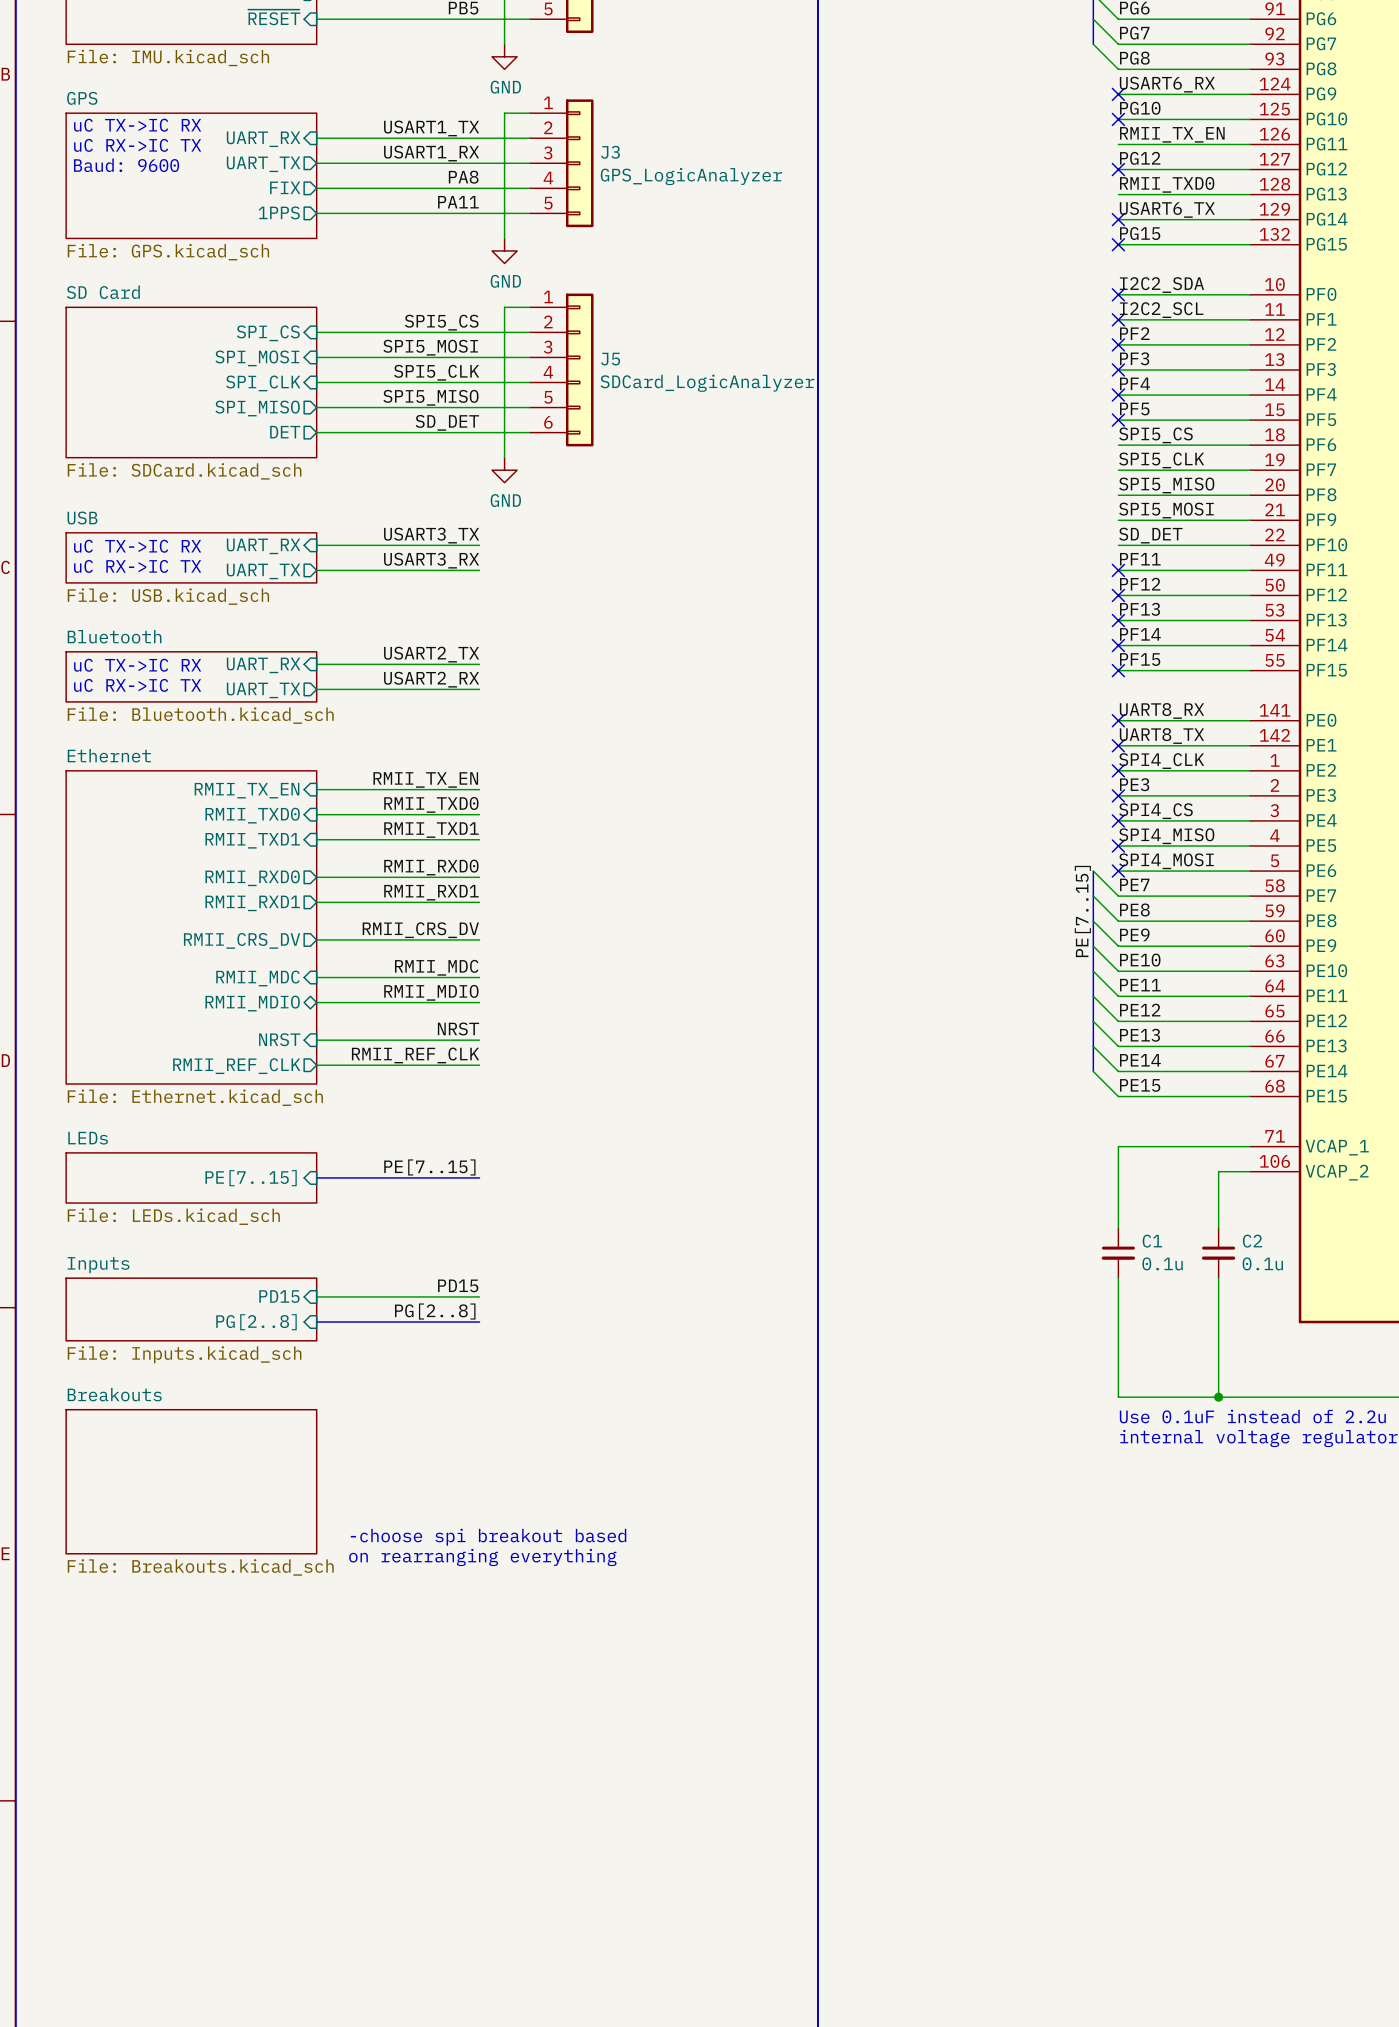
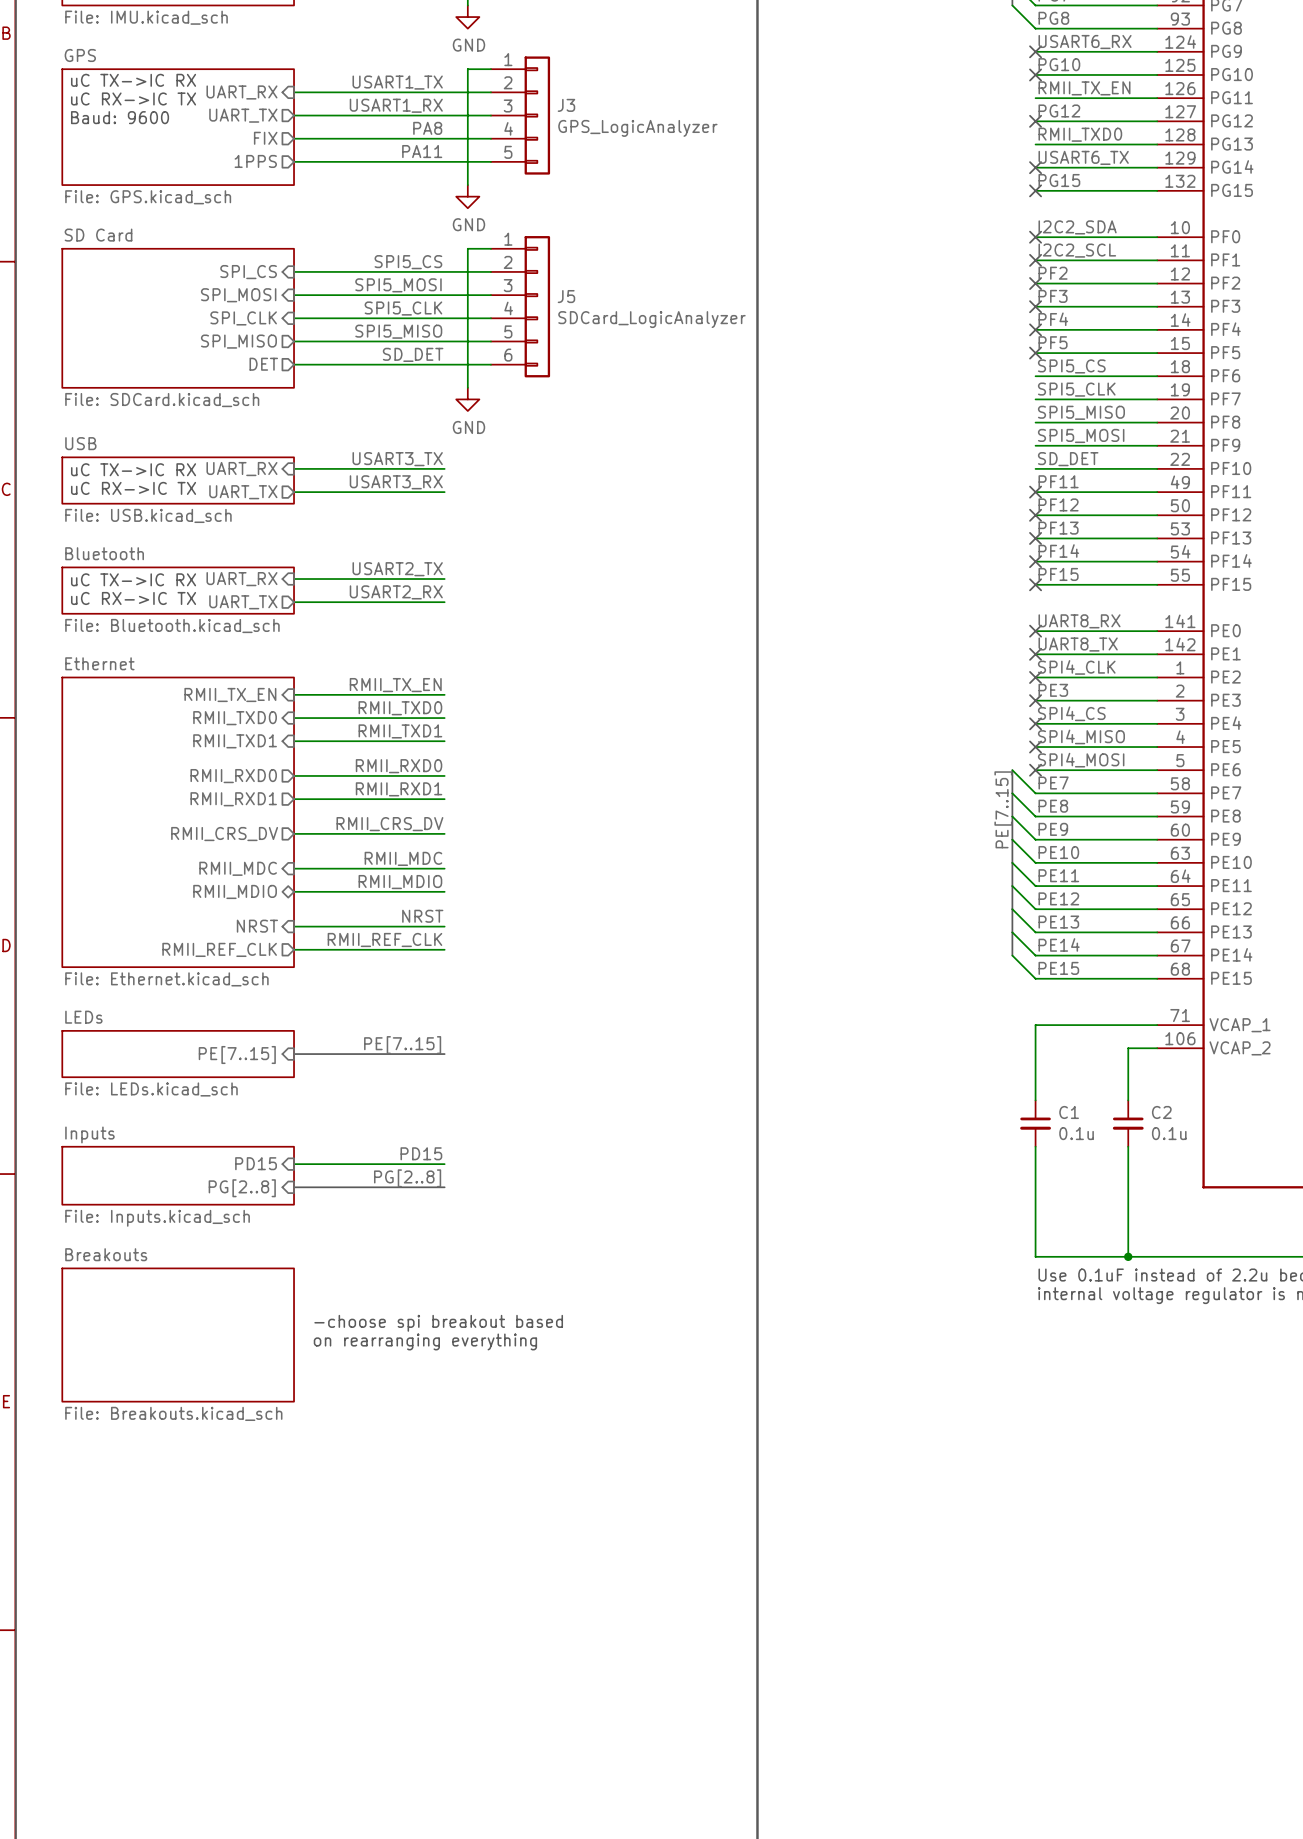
text position: -choose spi breakout based (488, 1537) -> -choose spi breakout based (438, 1323)
text position: on rearranging everything (482, 1557) -> on rearranging everything (425, 1341)

